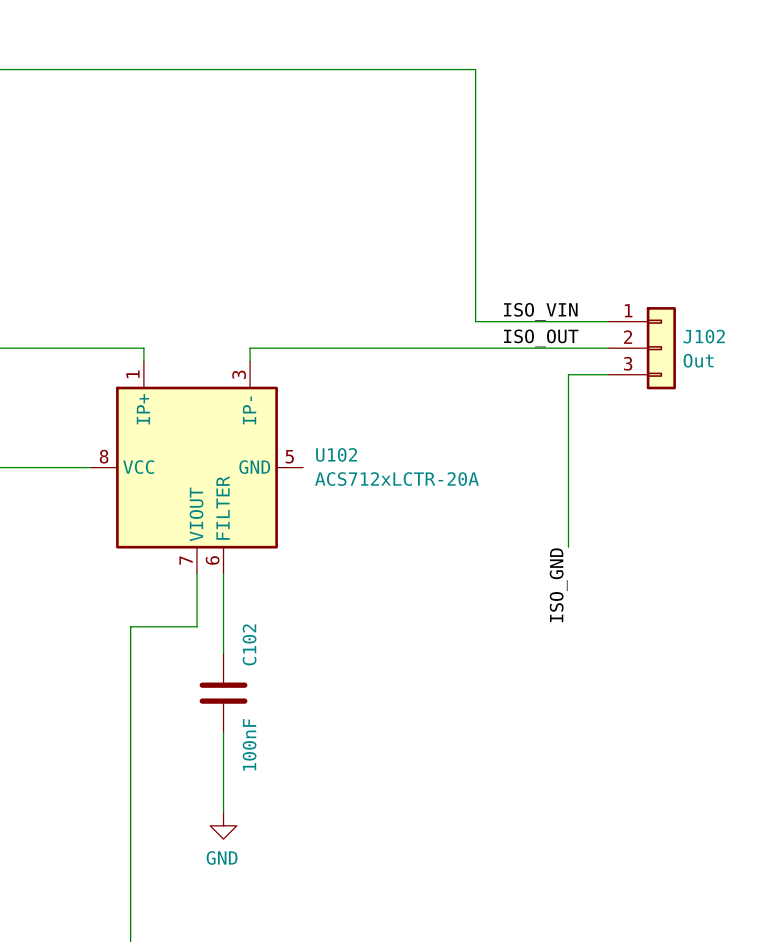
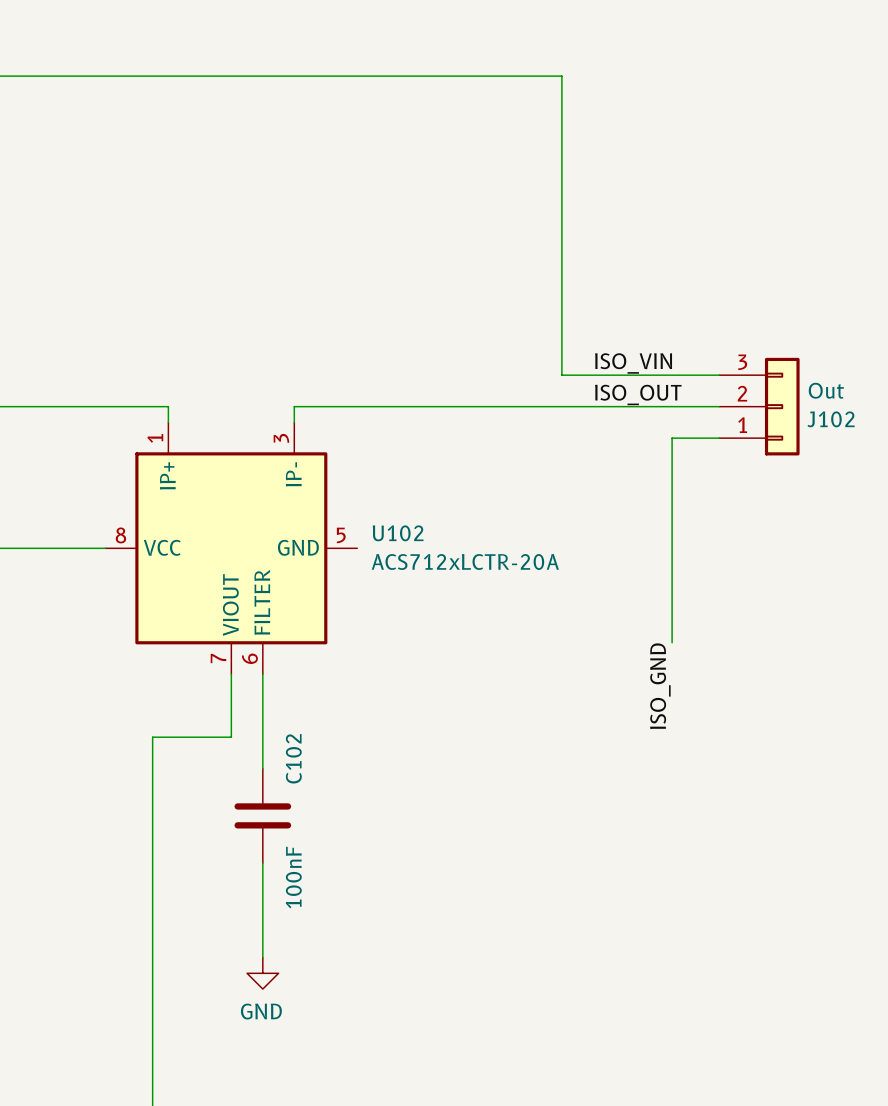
J102 flip: as is (661, 348) -> up-down (782, 406)

